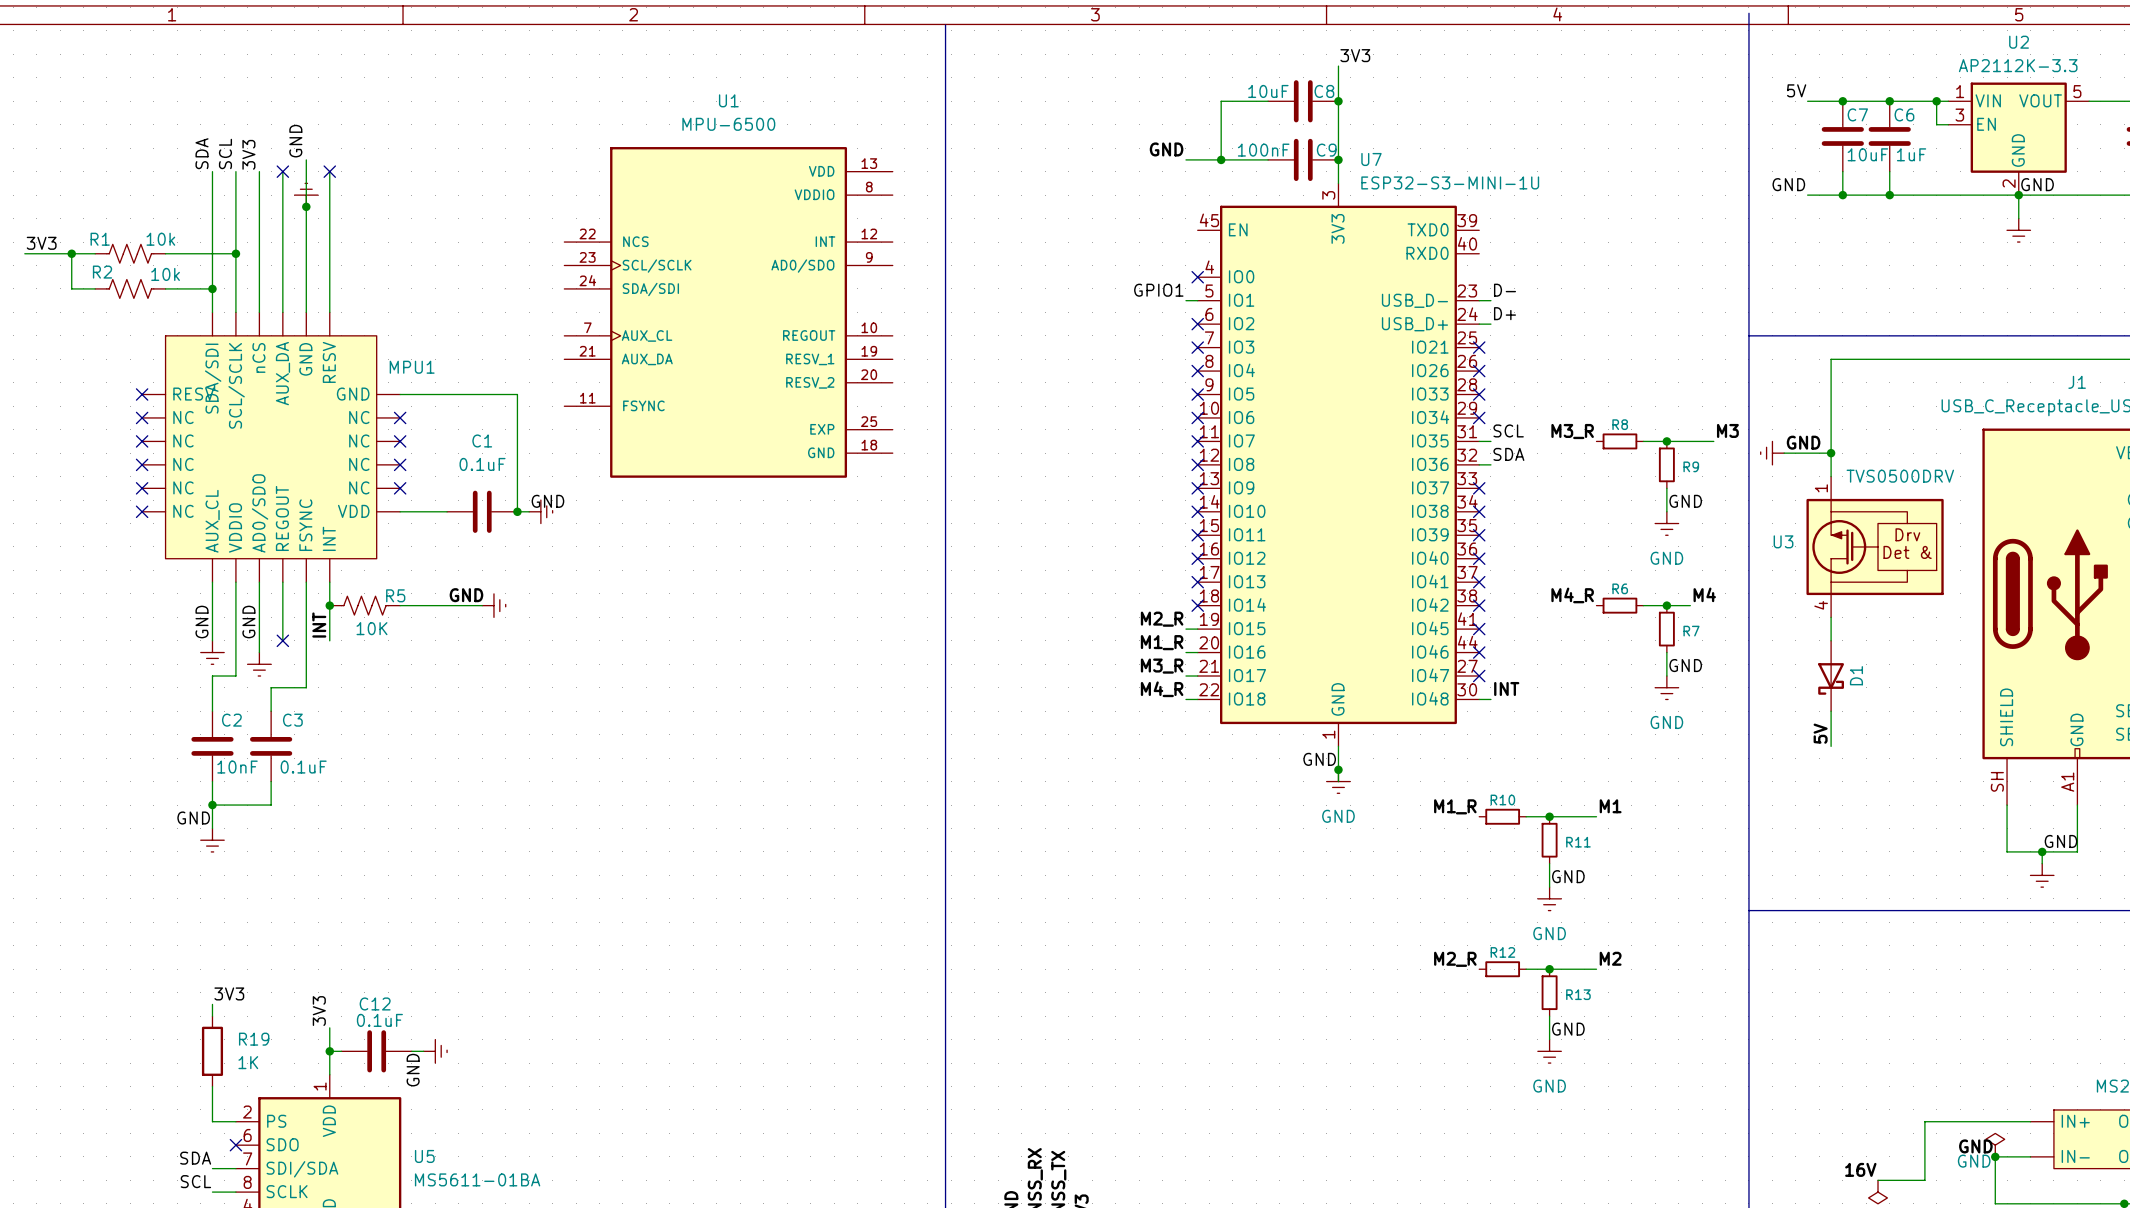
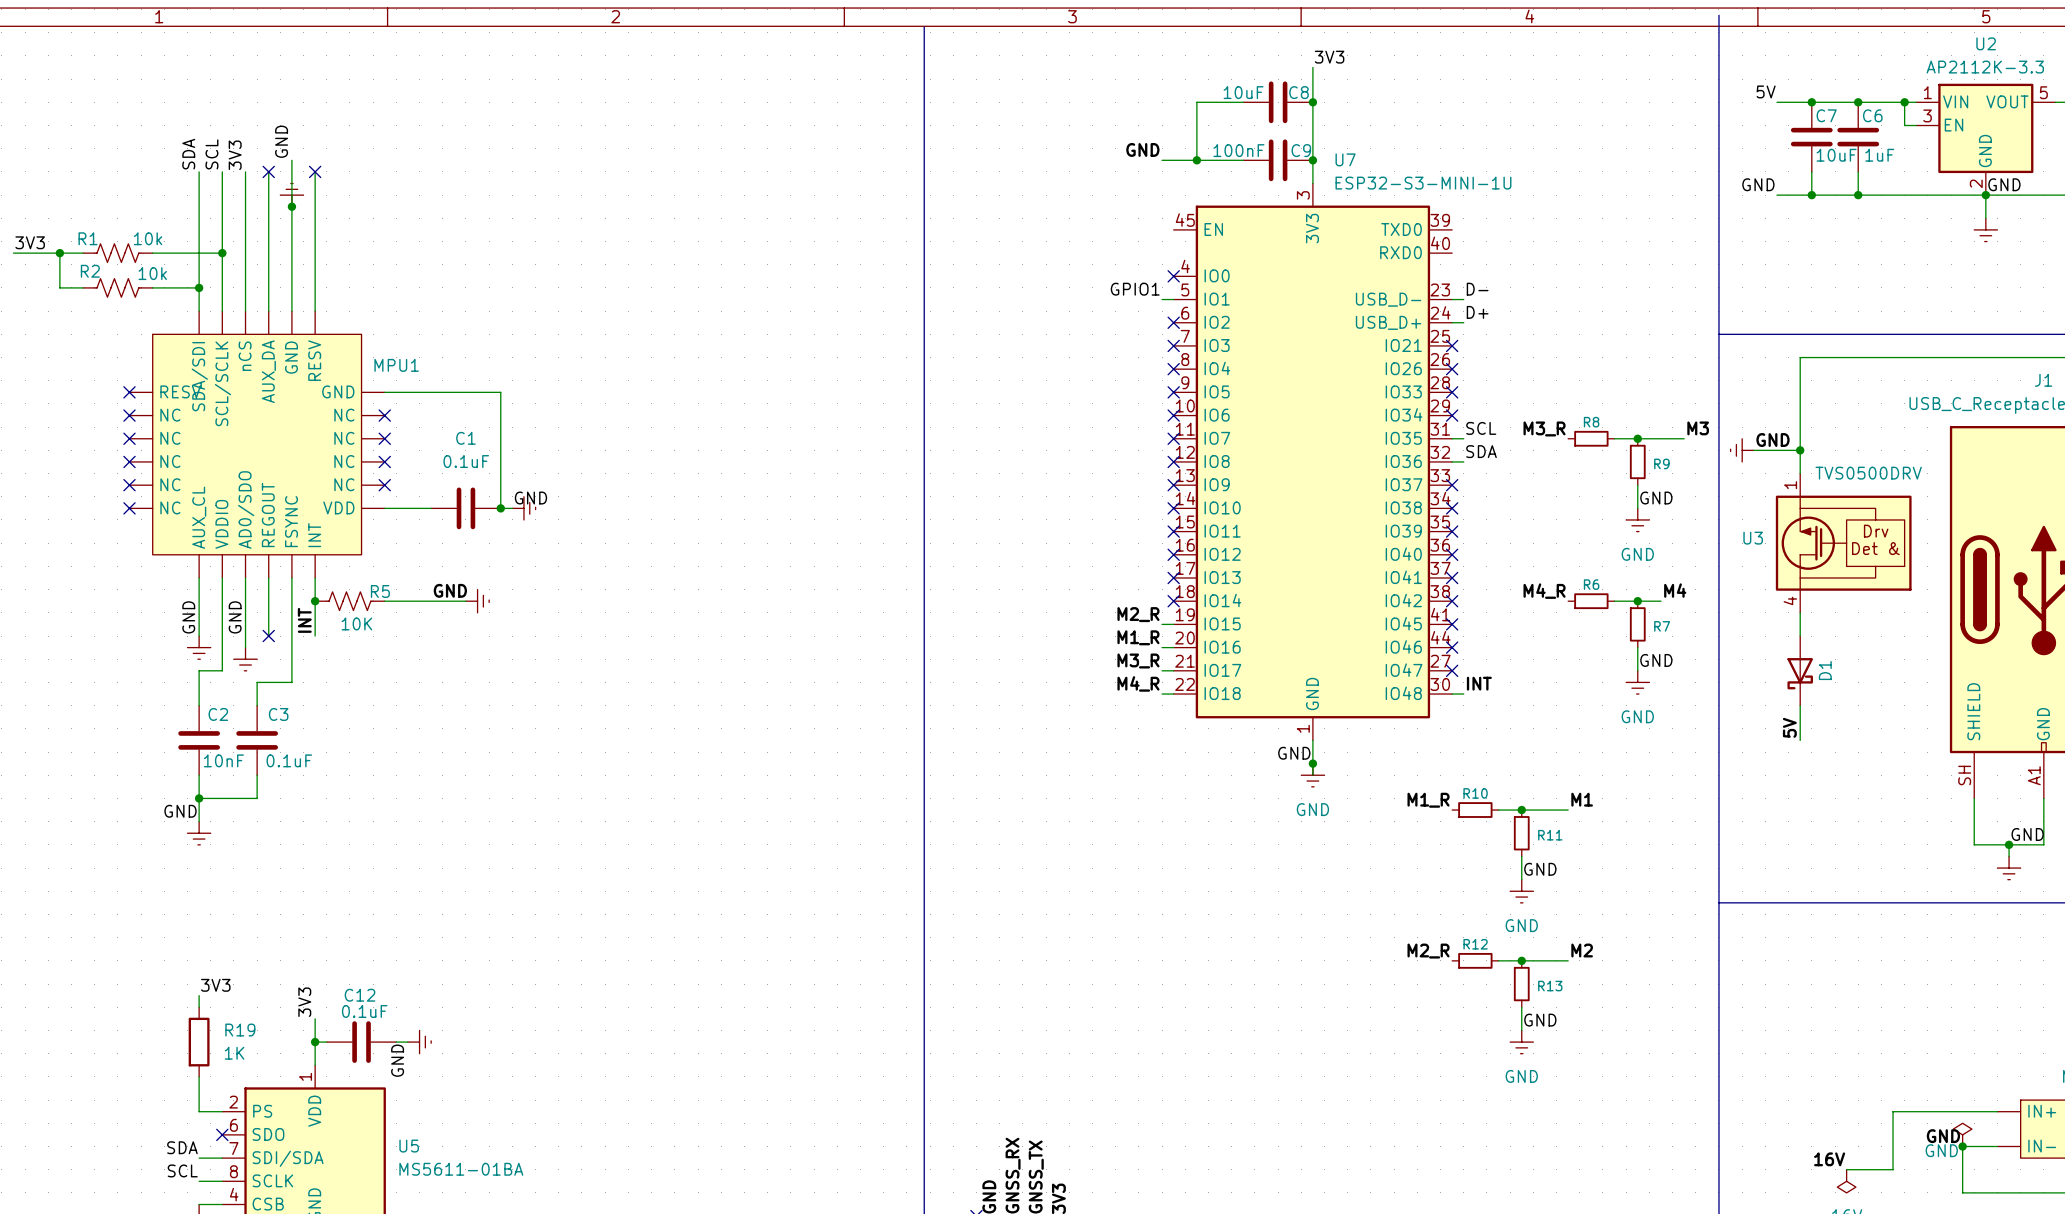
U1: MPU-6500 (728, 312) -> none

